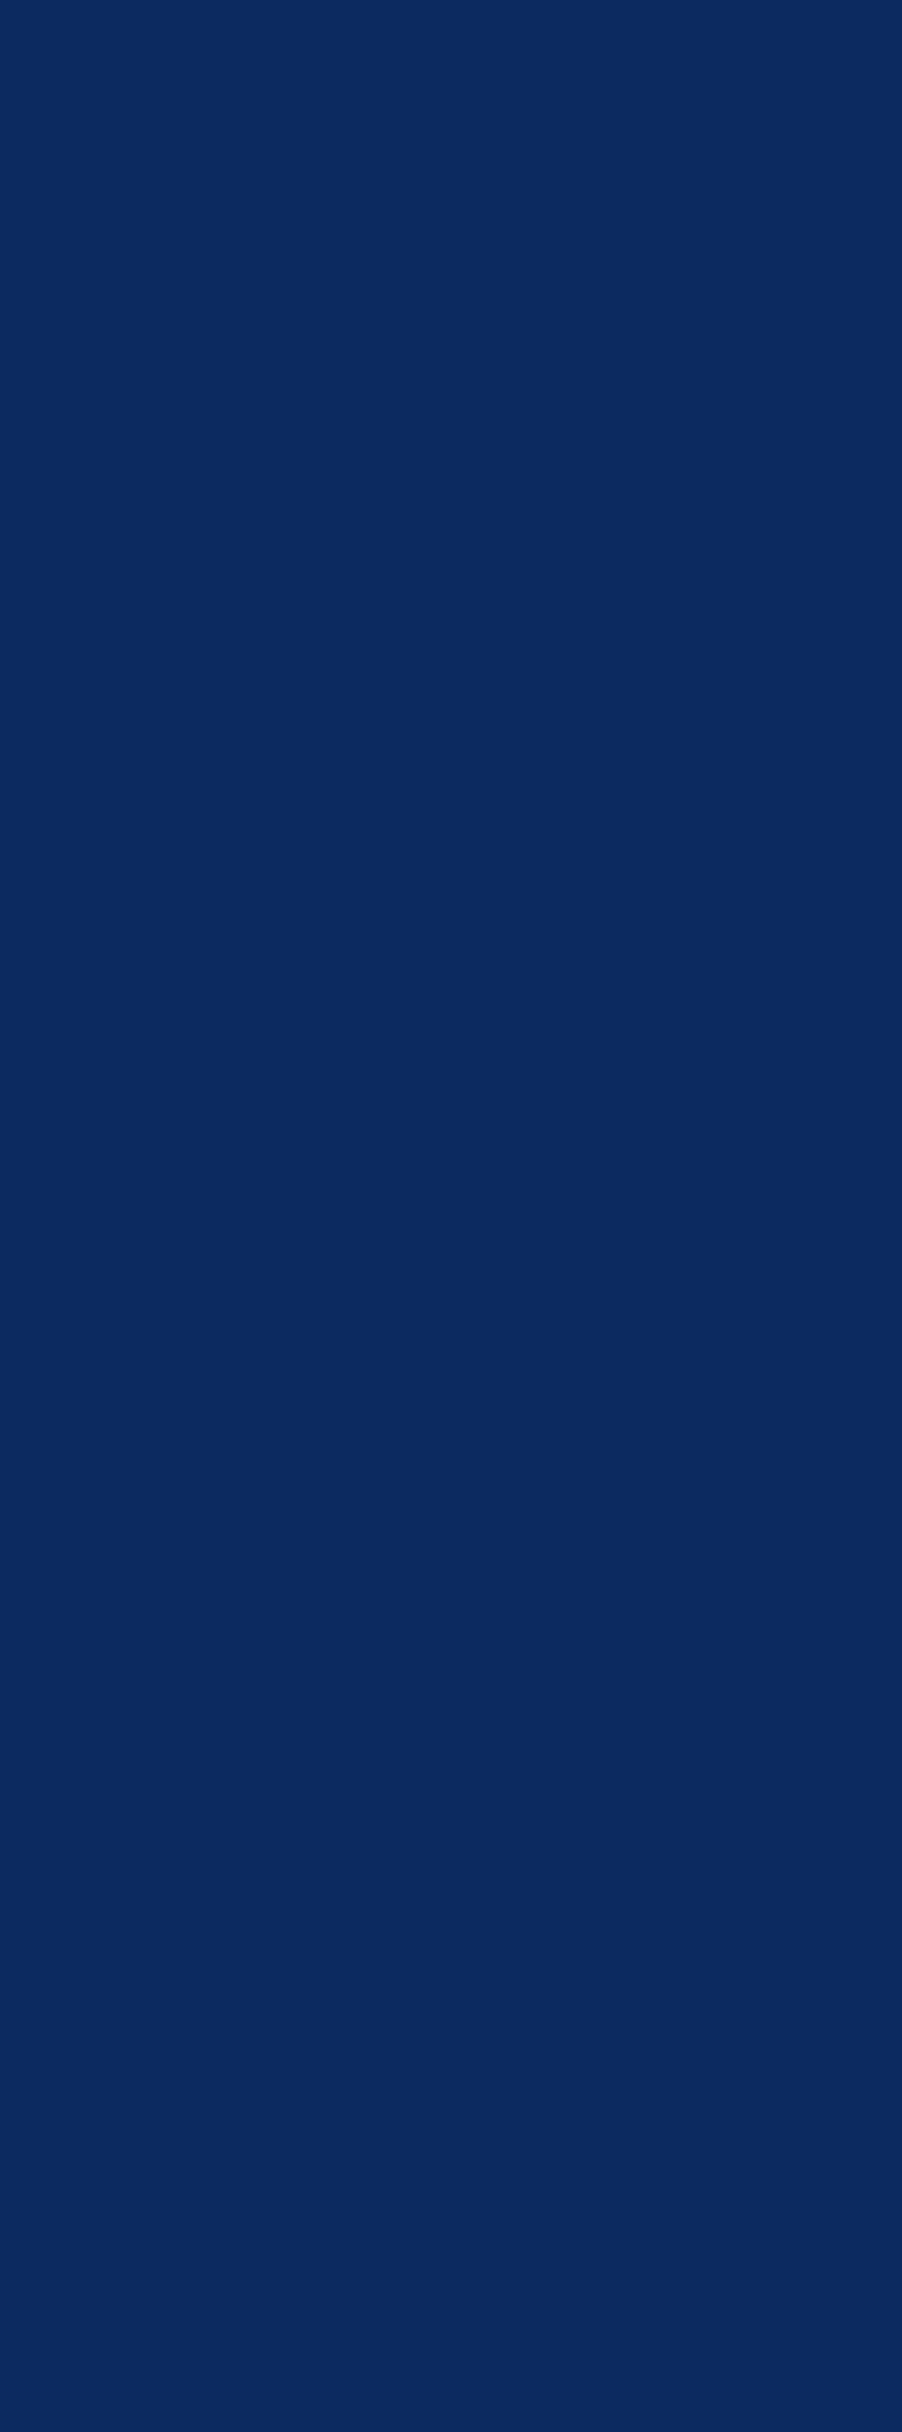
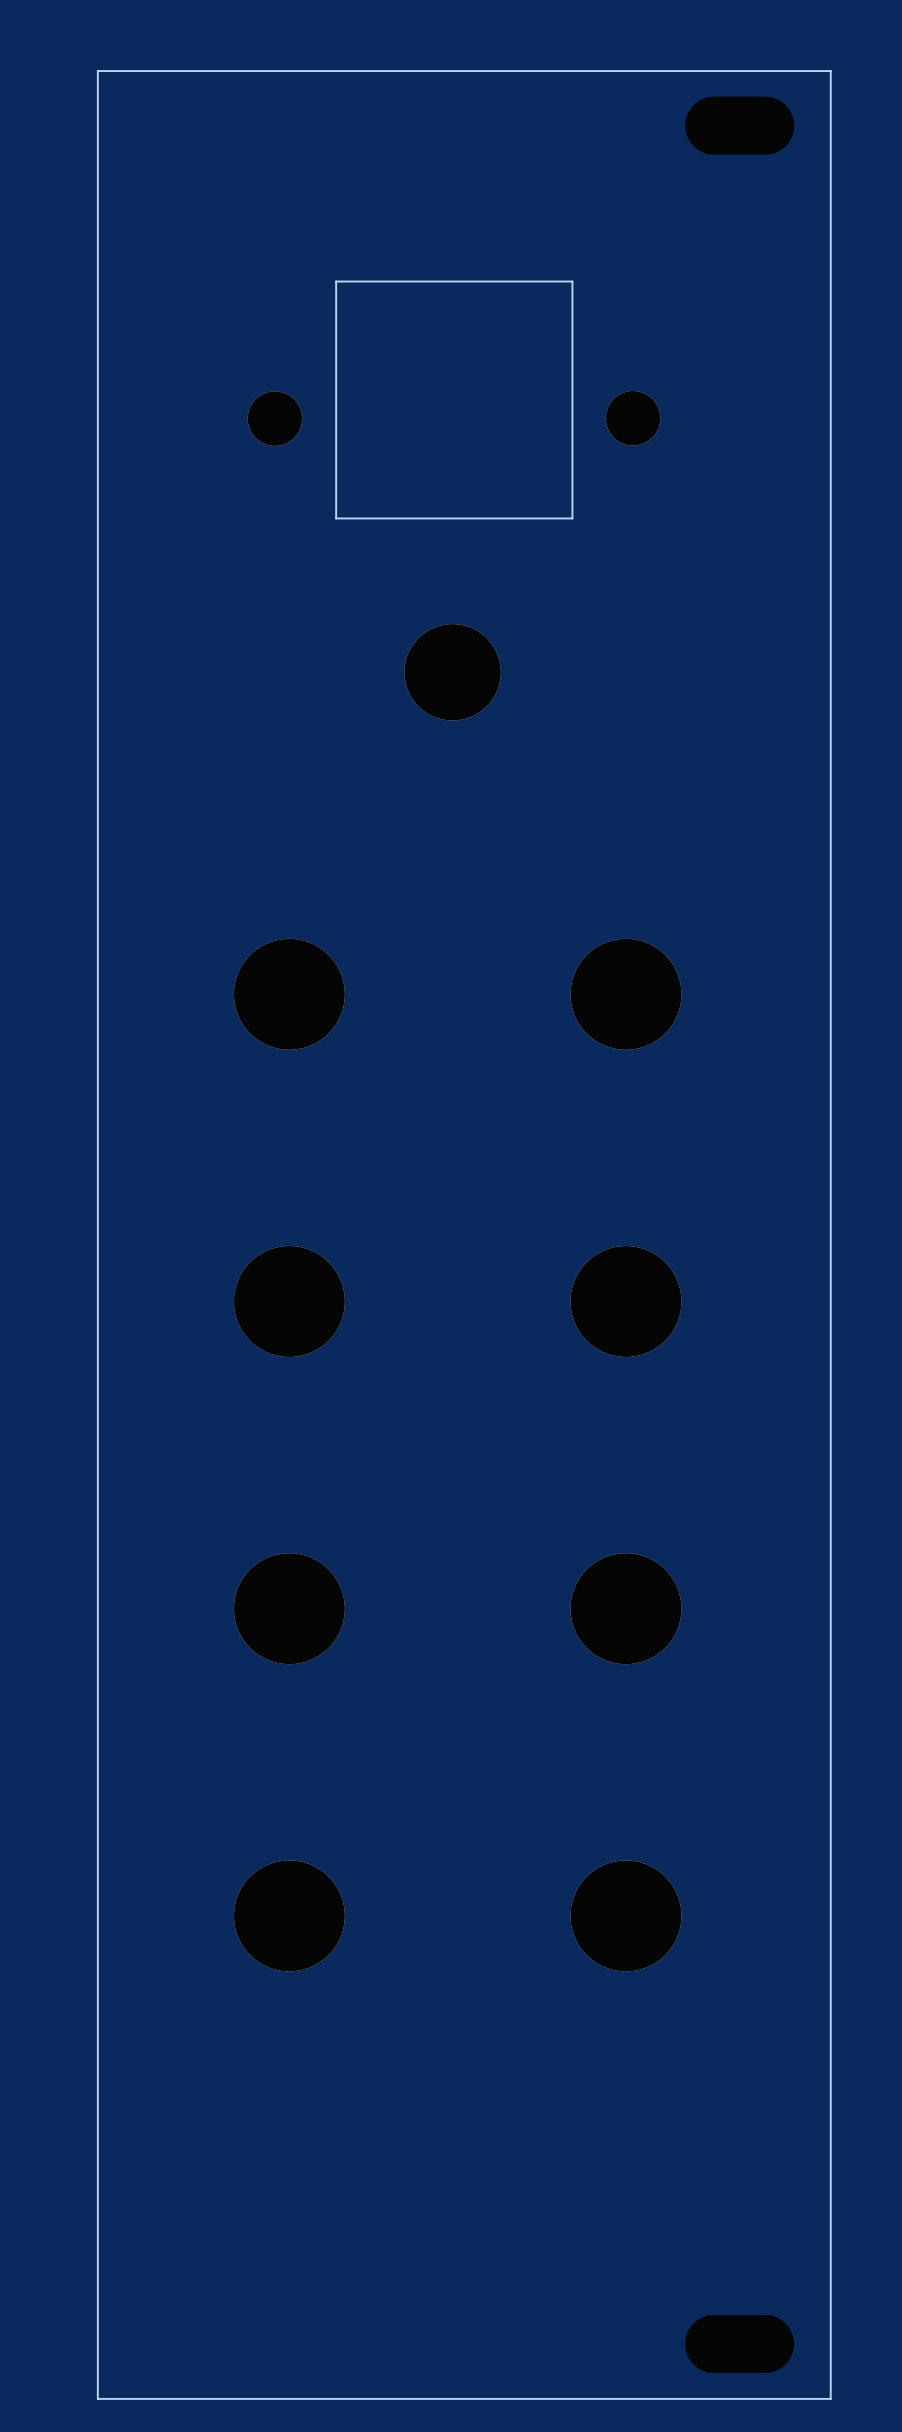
board edge: none -> (830, 71) (97, 71) (97, 2398) (830, 2398) (830, 71)
part: none -> (739, 125)
board edge: none -> (572, 281) (336, 281) (336, 518) (572, 518) (572, 281)
part: none -> (274, 418)
part: none -> (633, 418)
part: none -> (452, 672)
part: none -> (289, 994)
part: none -> (625, 994)
part: none -> (289, 1301)
part: none -> (625, 1301)
part: none -> (289, 1608)
part: none -> (625, 1608)
part: none -> (289, 1915)
part: none -> (625, 1915)
part: none -> (739, 2343)

